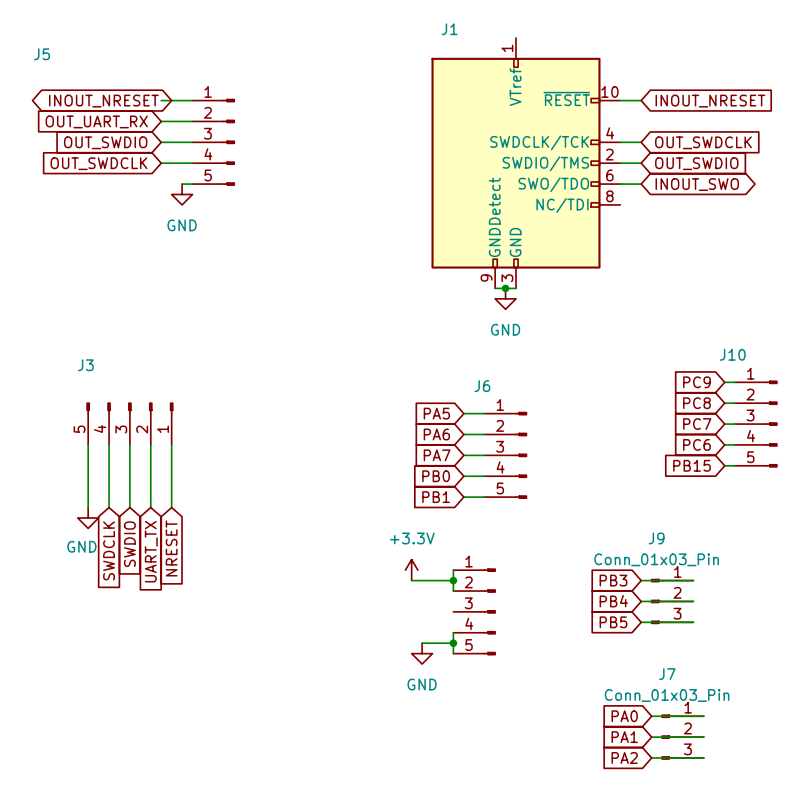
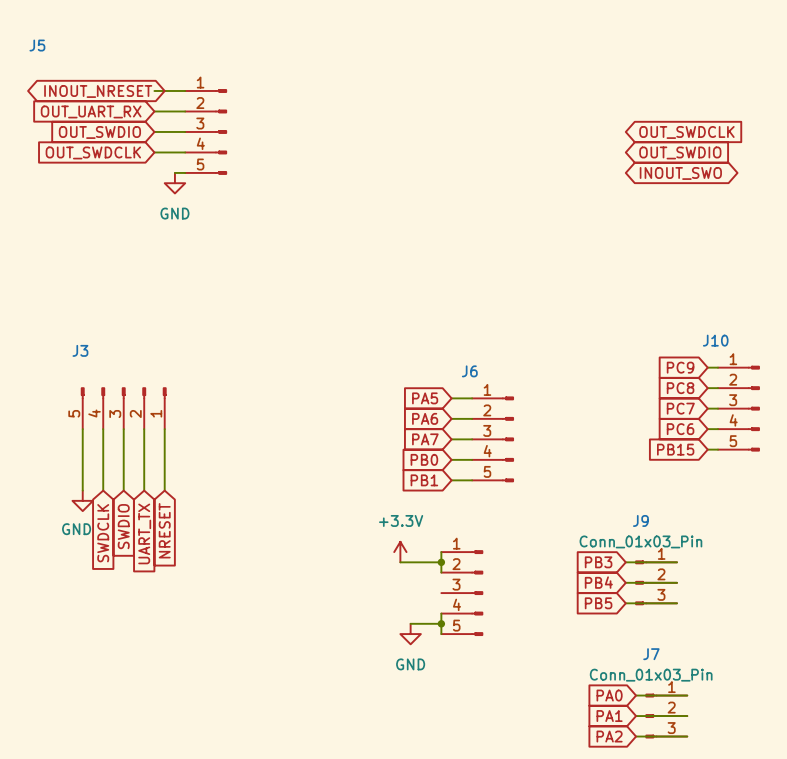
wire: (620, 100) (641, 100) -> none
global label: INOUT_NRESET (710, 101) -> none
wire: (620, 142) (641, 142) -> none
J1: (525, 163) -> none
wire: (620, 163) (641, 163) -> none
wire: (620, 184) (641, 184) -> none
wire: (495, 288) (516, 288) -> none
junction: (505, 288) -> none
power symbol: GND (505, 298) -> none

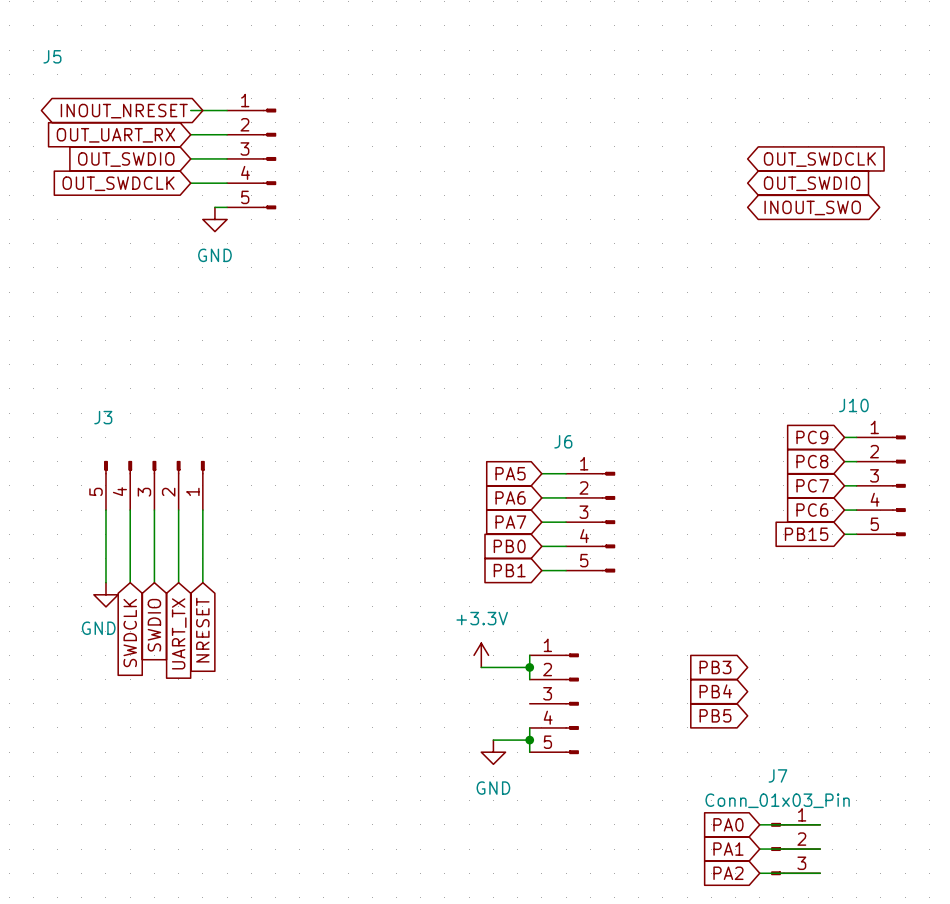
wire: (625, 562) (677, 562) -> none
wire: (625, 582) (677, 582) -> none
J9: Conn_01x03_Pin (656, 582) -> none
wire: (625, 603) (677, 603) -> none

